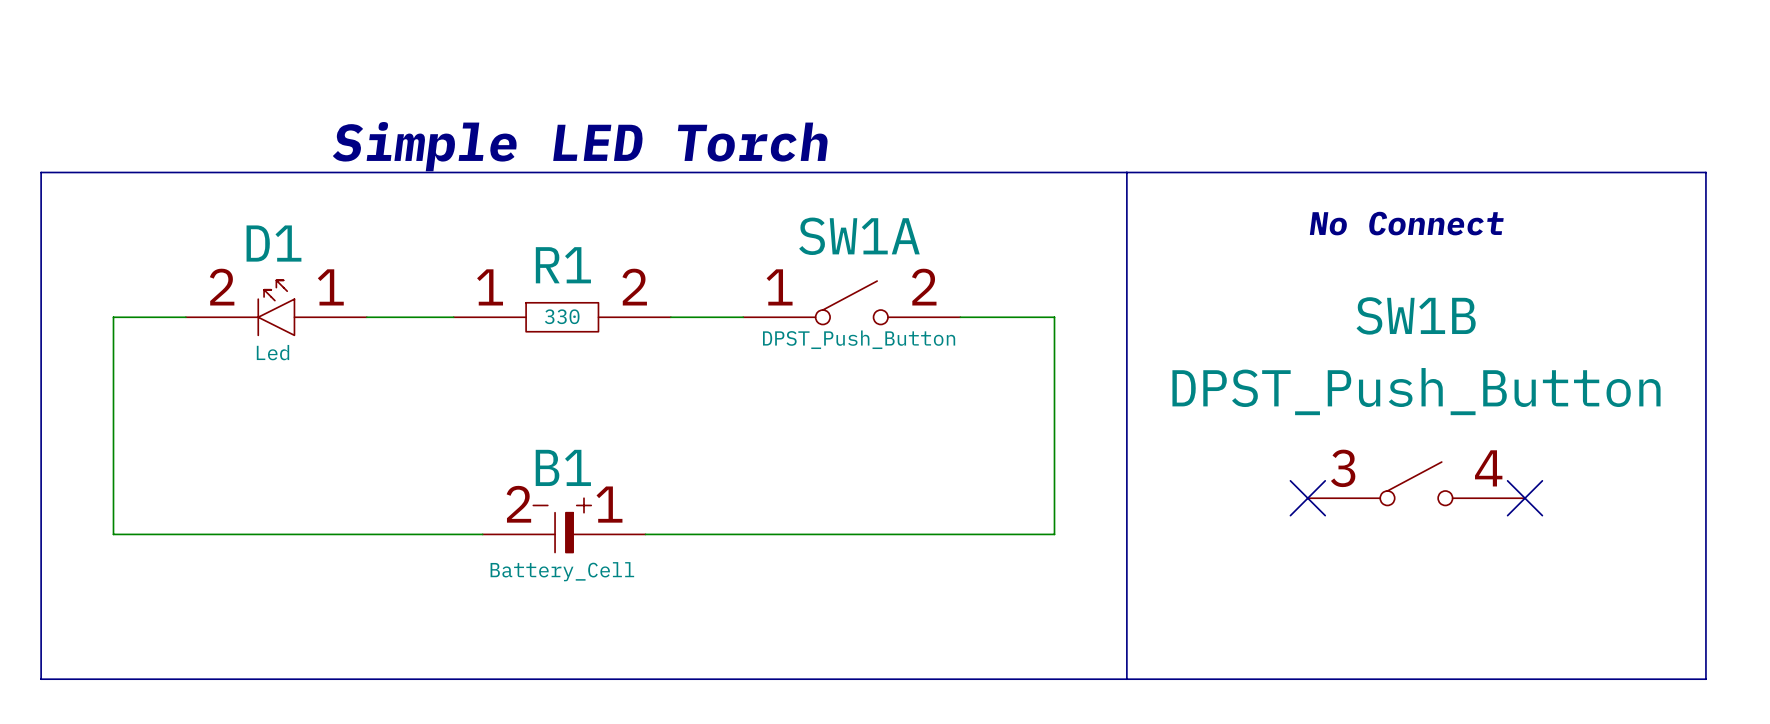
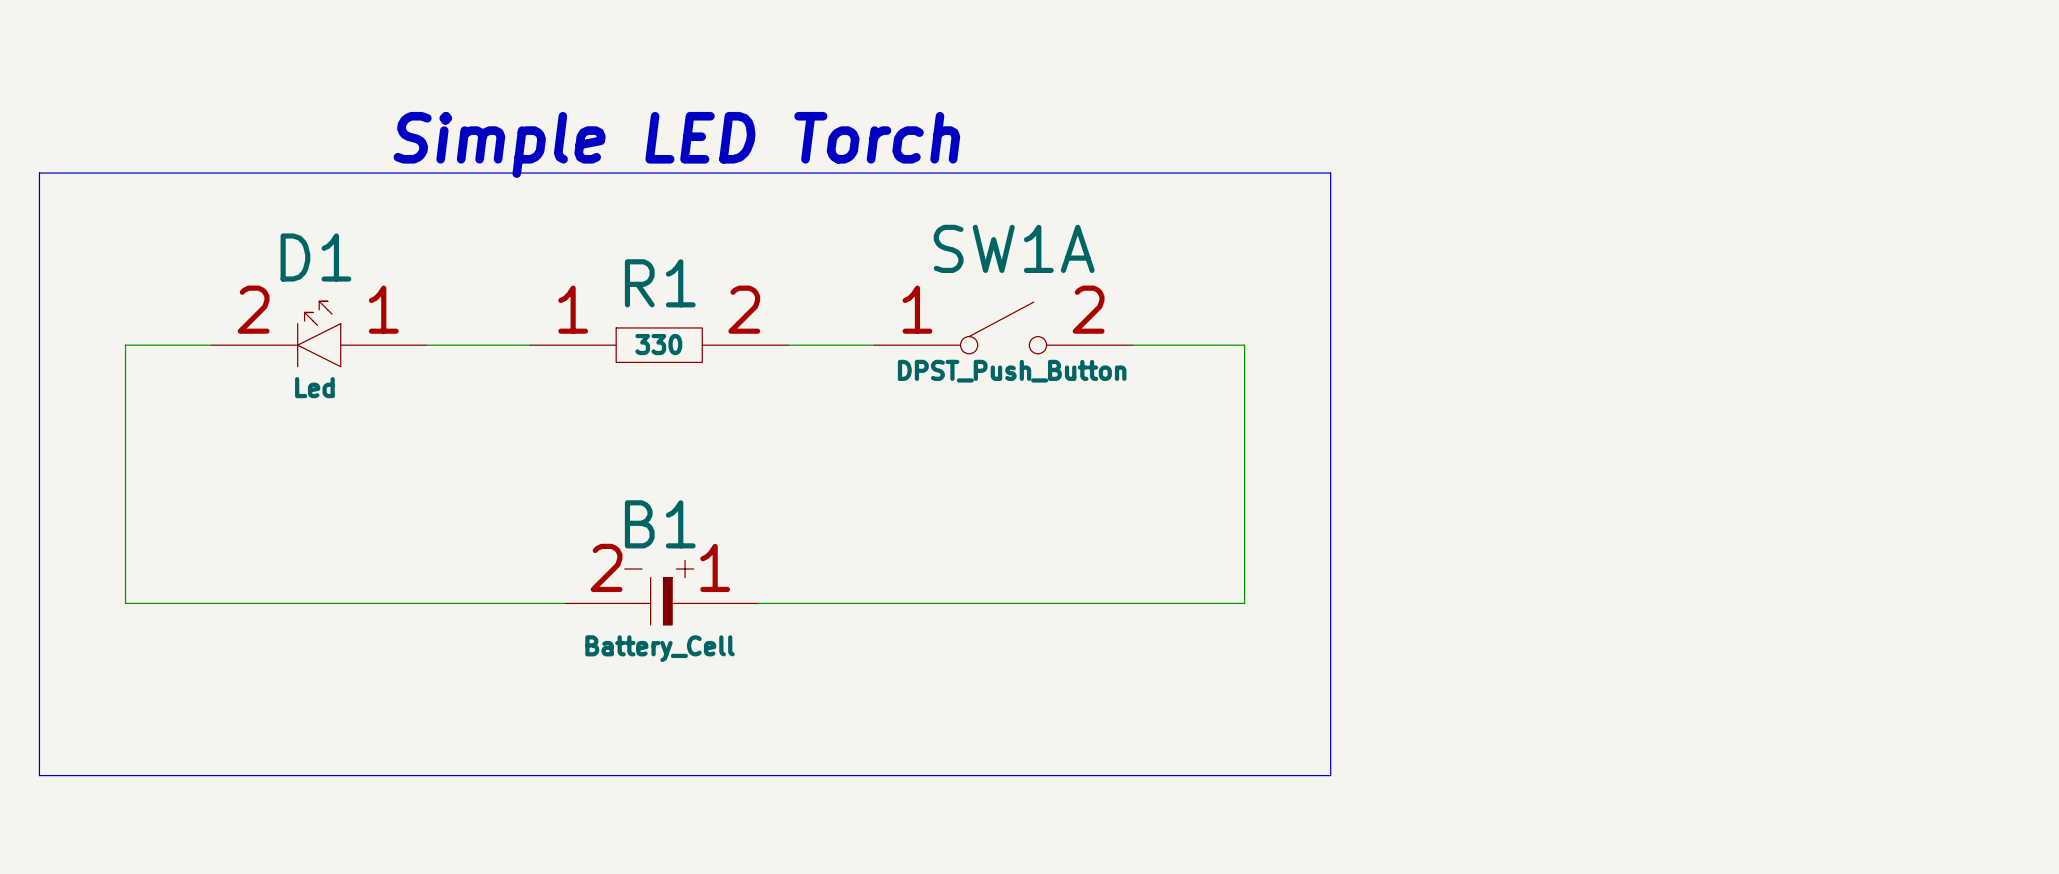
line: (1126, 172) (1705, 172) (1705, 679) (1126, 679) -> none
text: No Connect (1406, 223) -> none
SW1B: DPST_Push_Button (1416, 483) -> none
no-connect mark: (1307, 498) -> none
no-connect mark: (1524, 498) -> none

